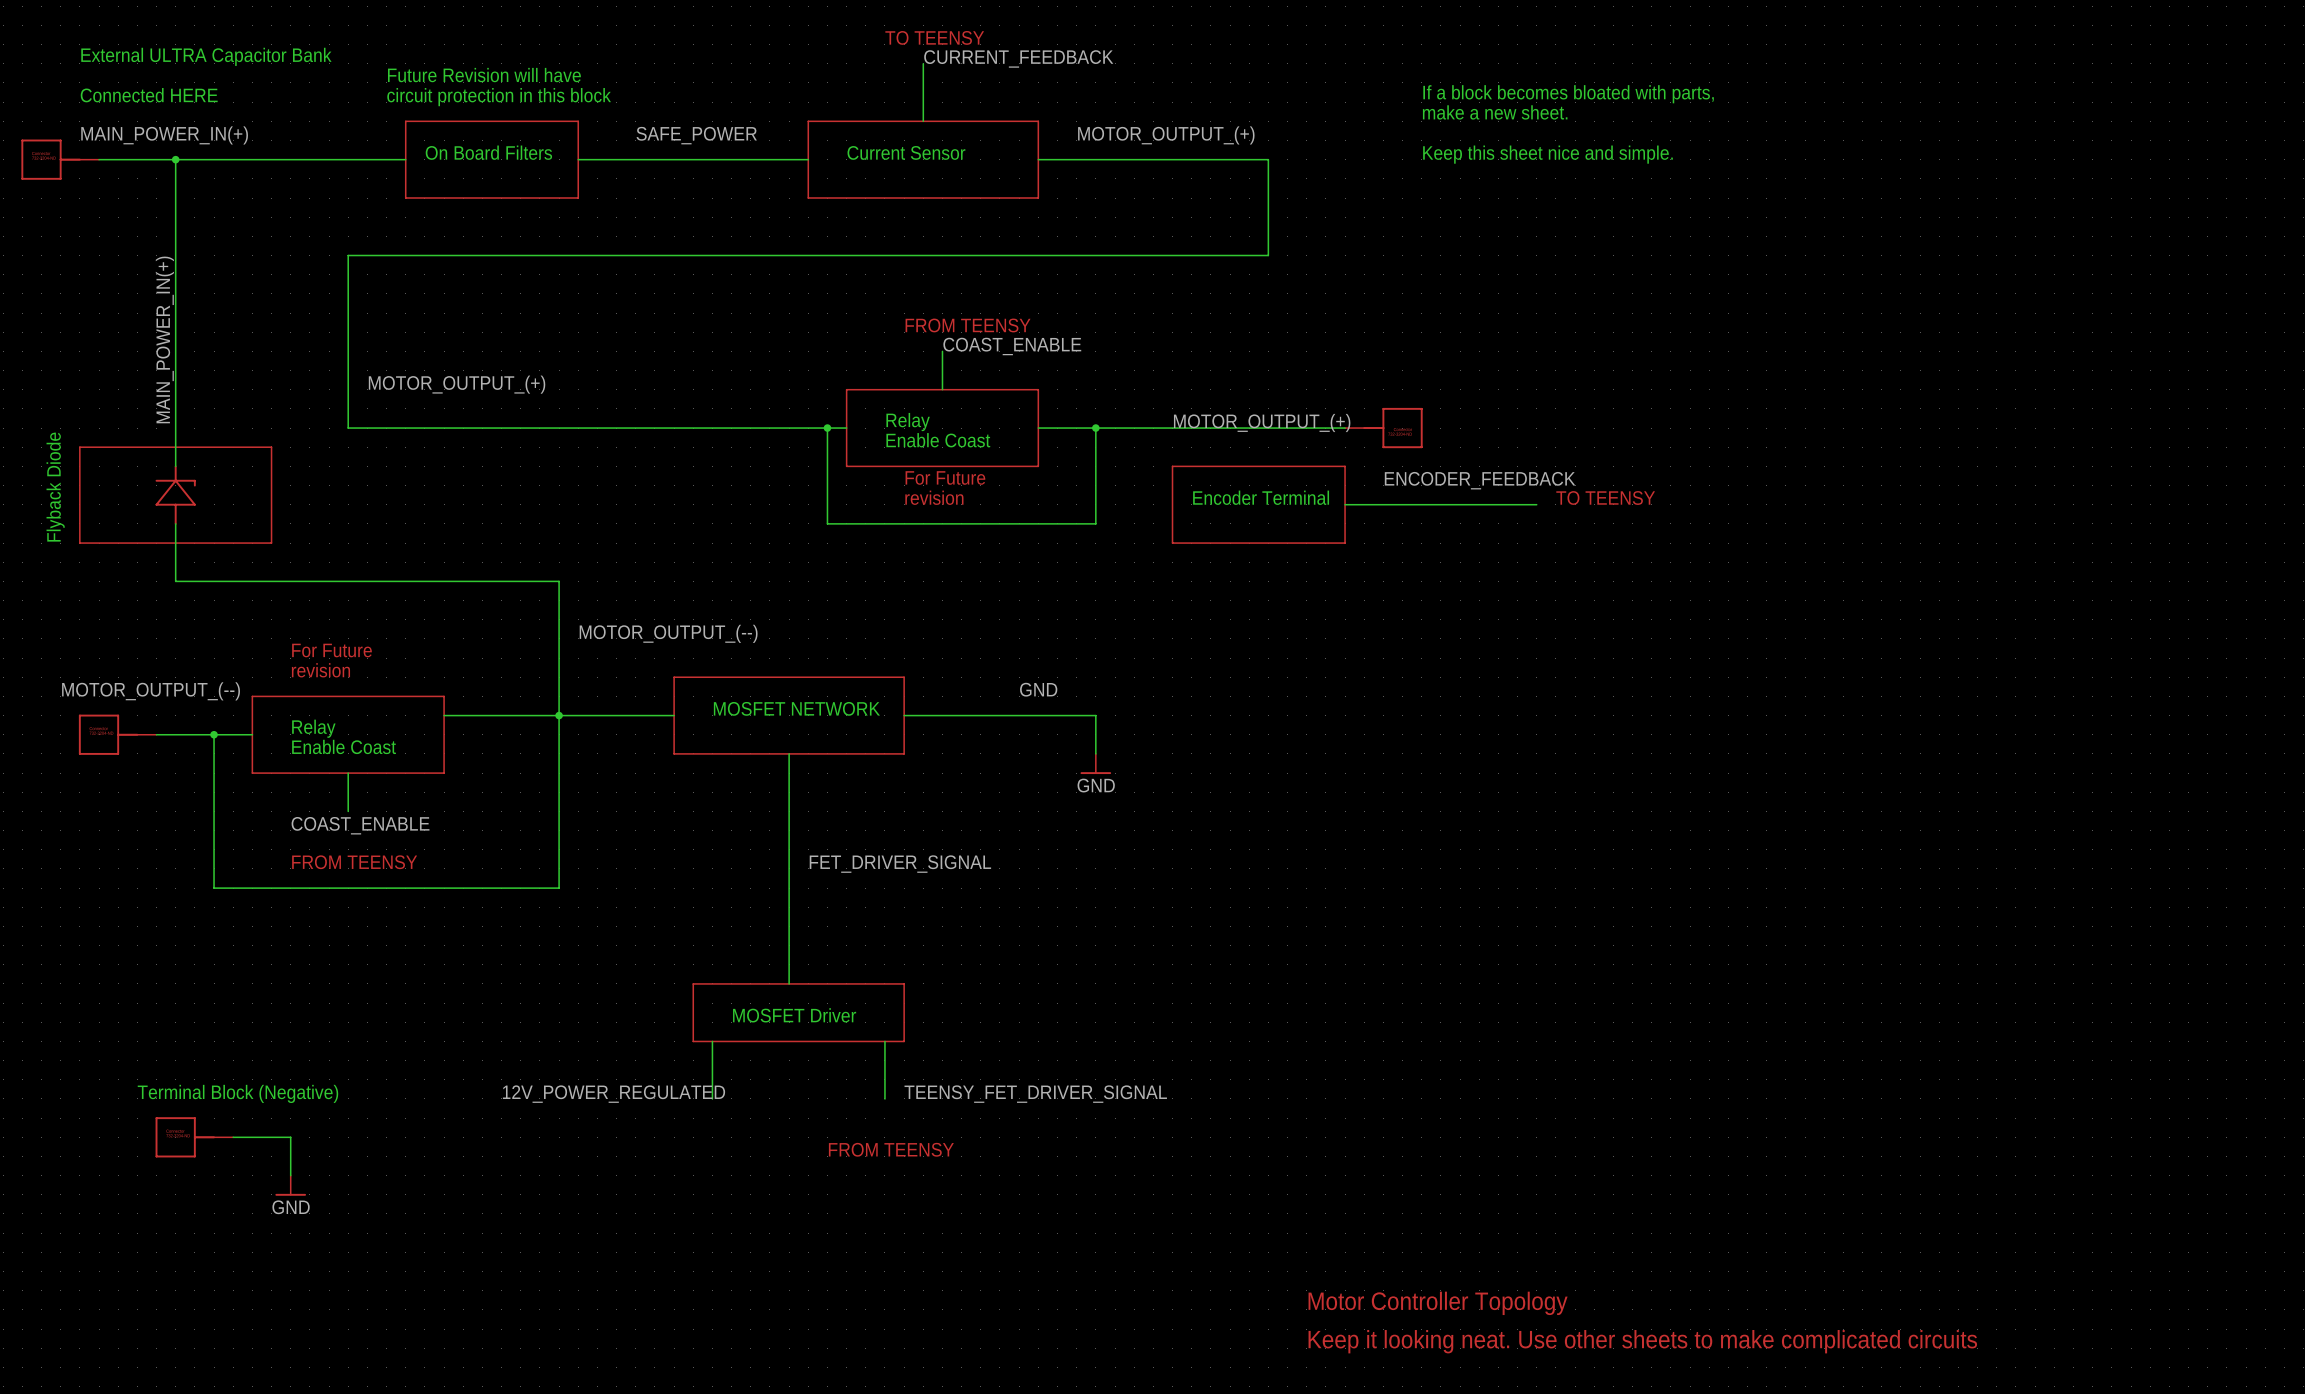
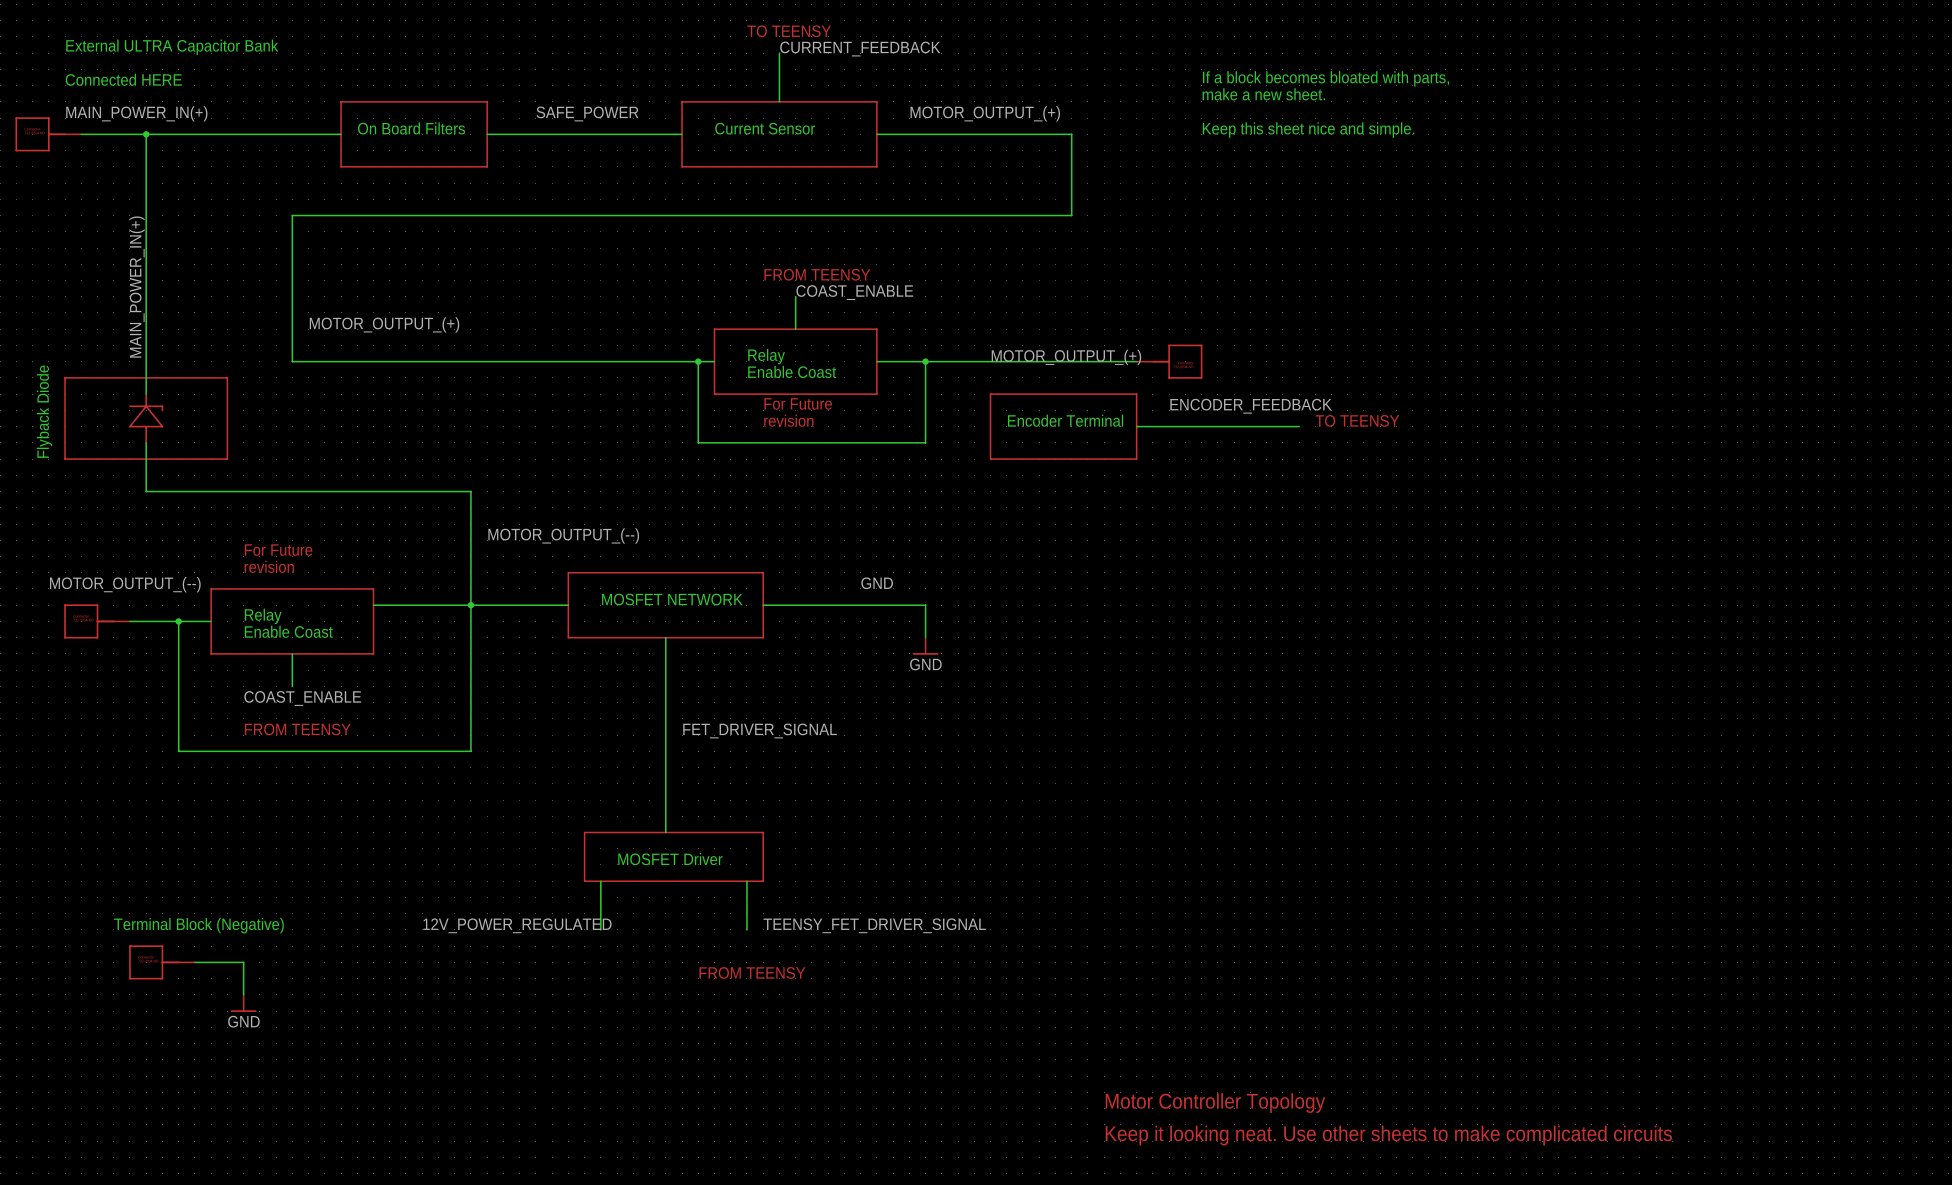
text: Future Revision will have (484, 75) -> none
text: circuit protection in this block (499, 97) -> none

